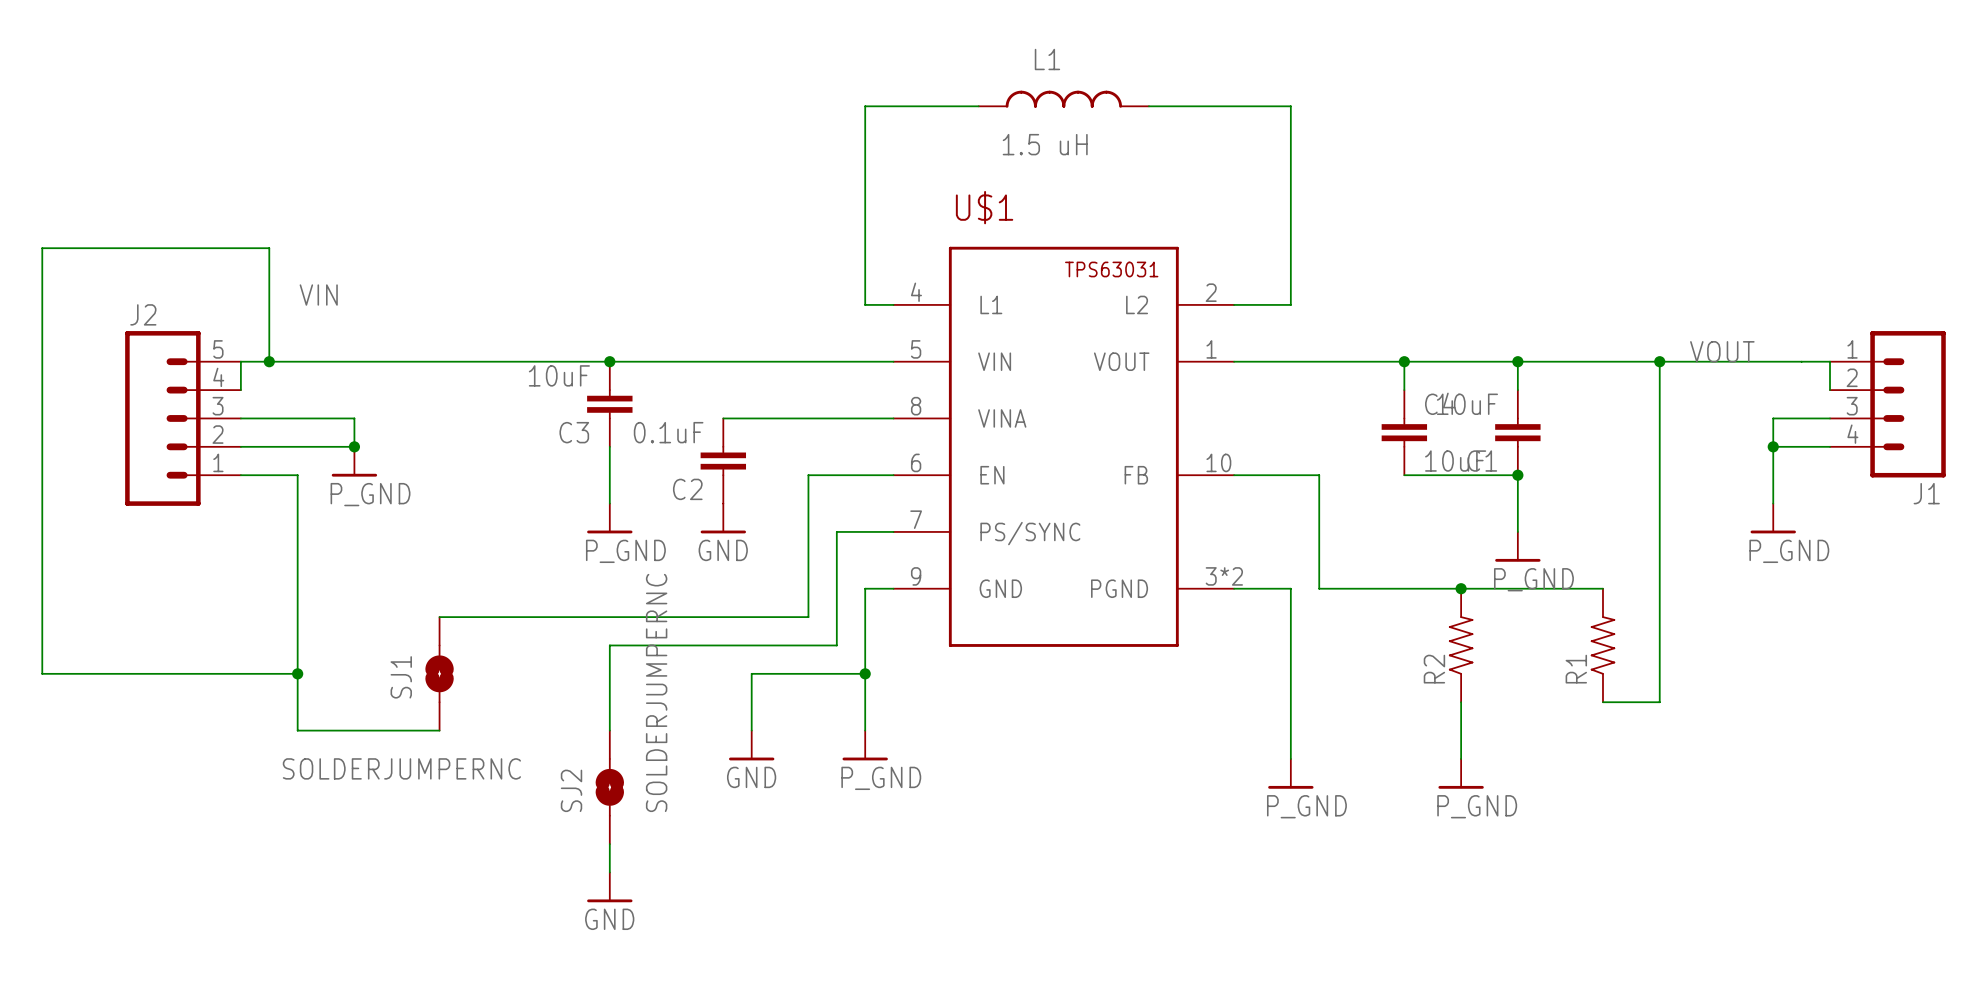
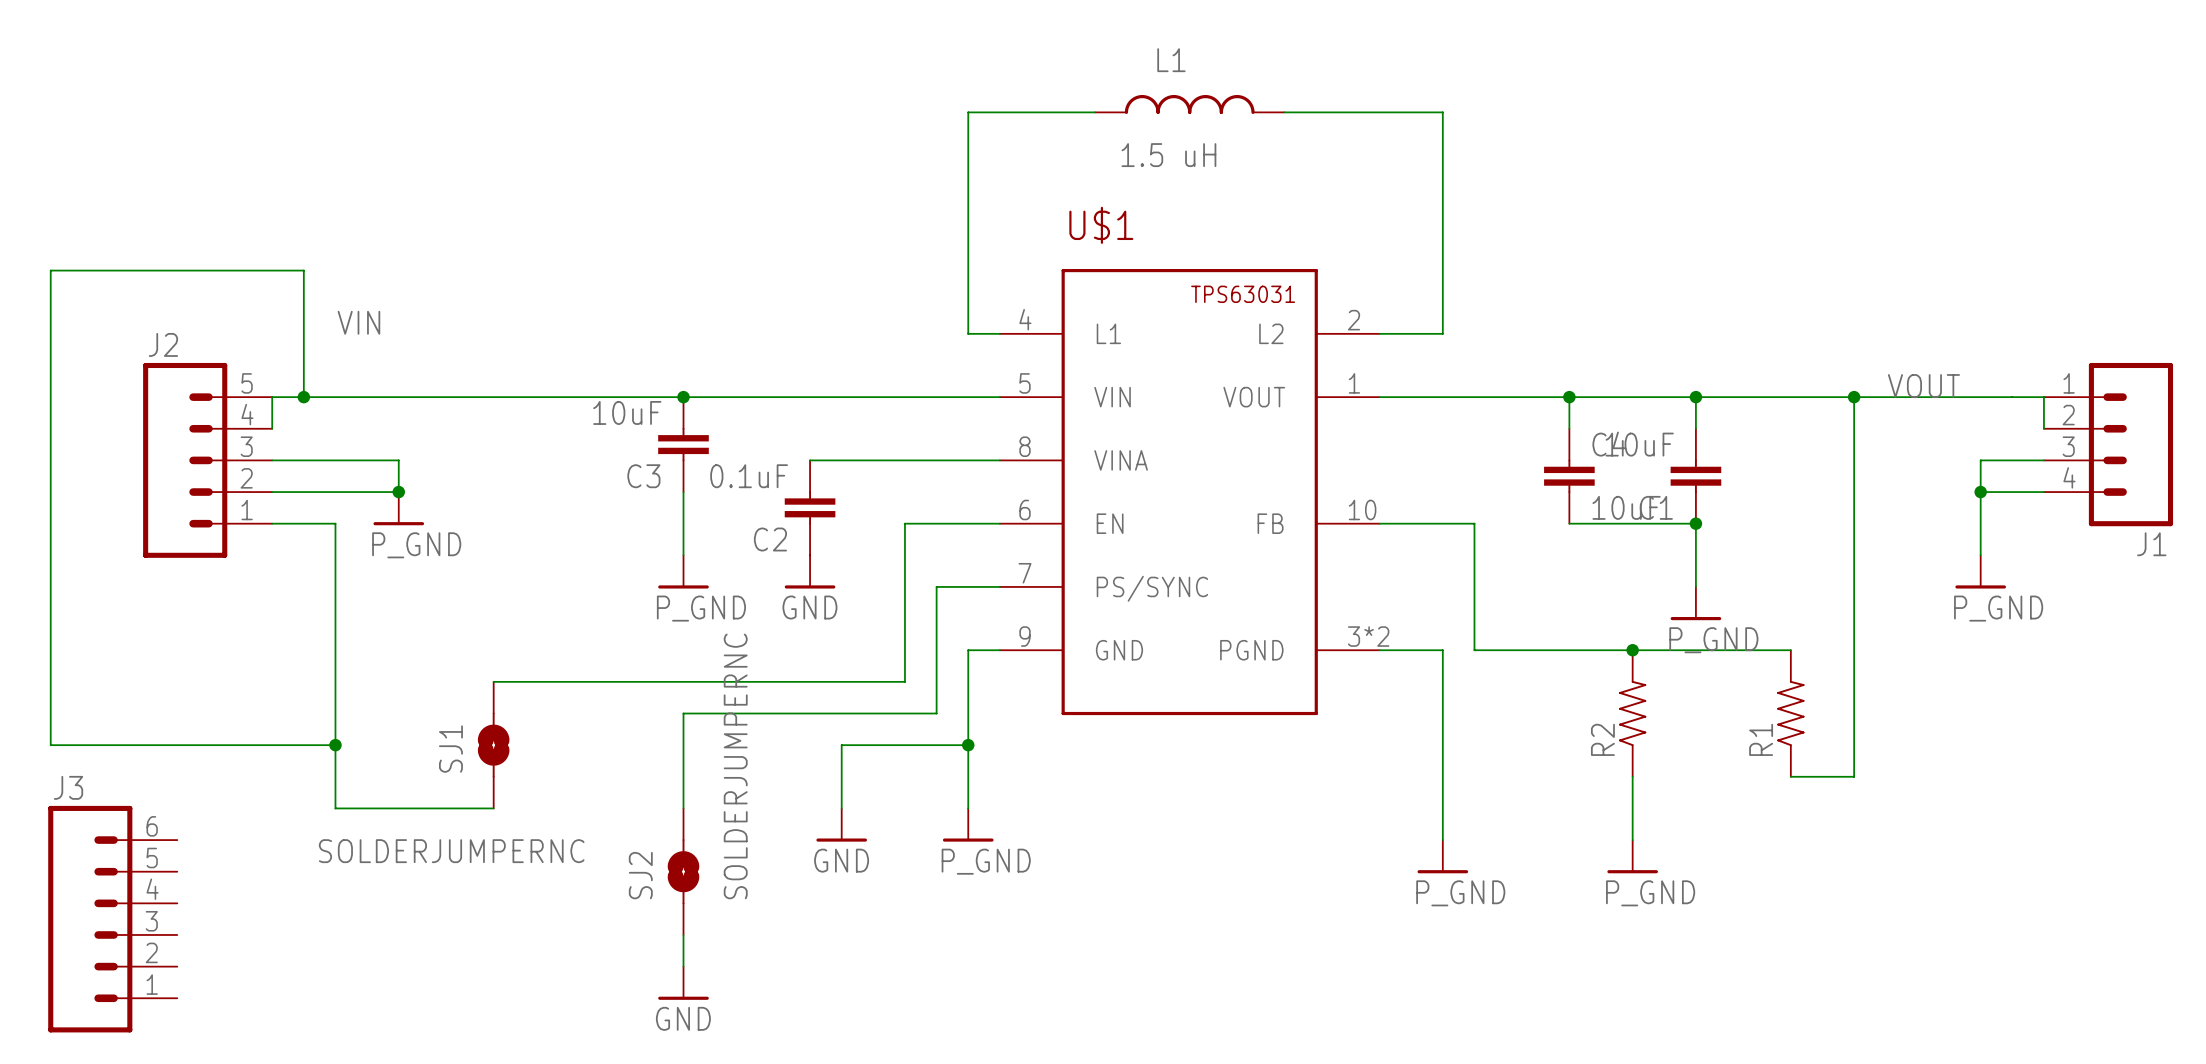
J3: none -> (112, 919)

